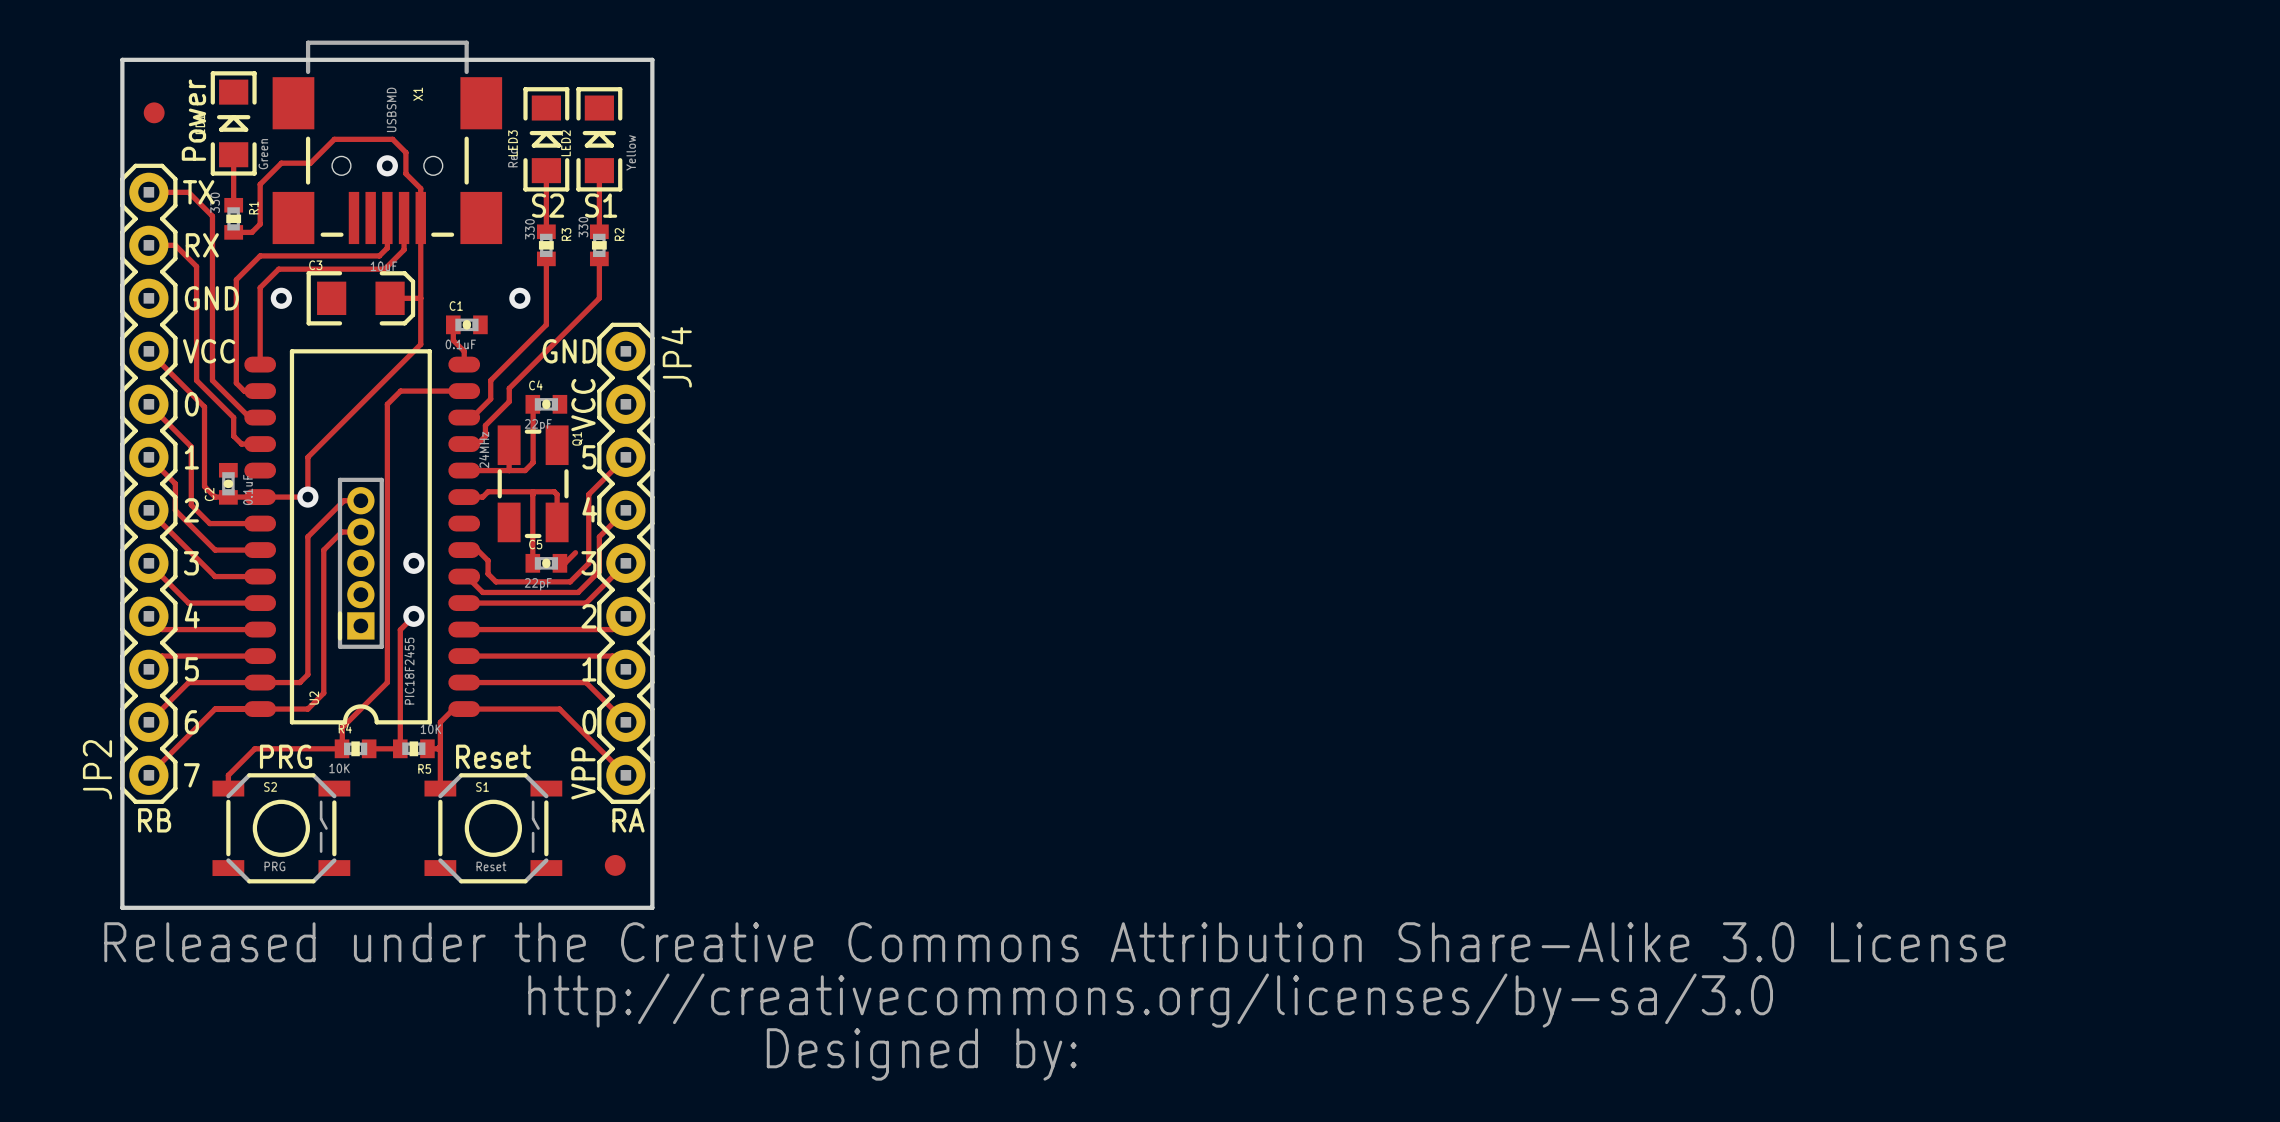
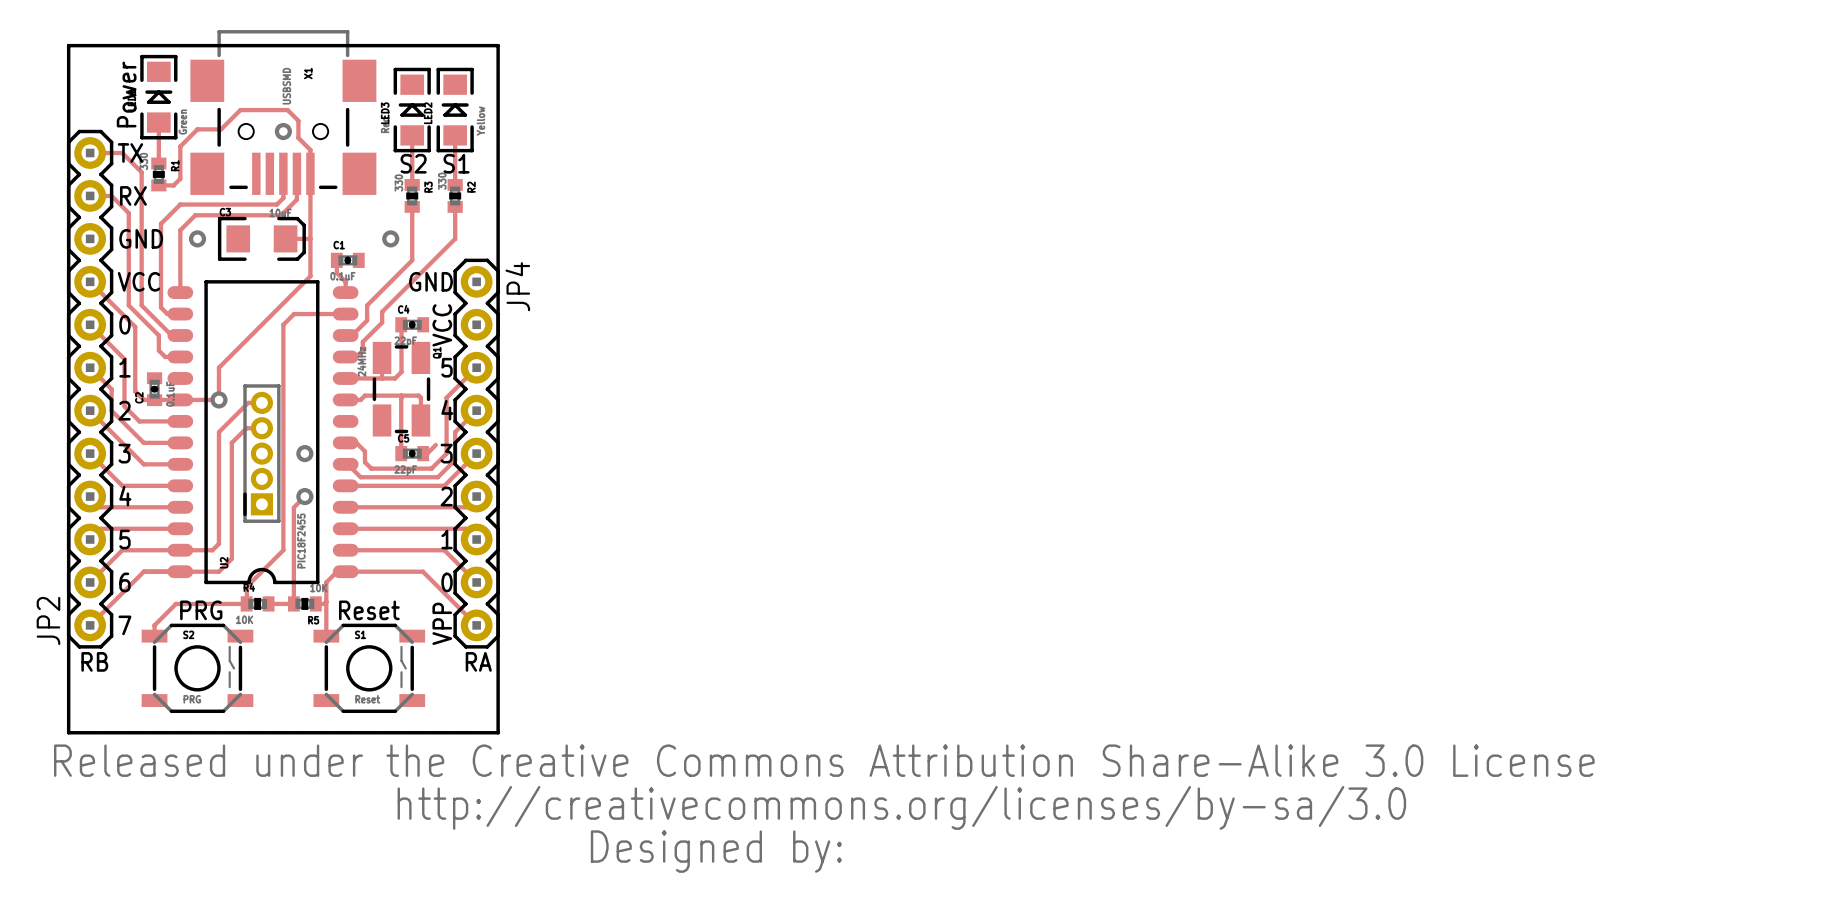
part: (154, 112) -> none
part: (615, 865) -> none

